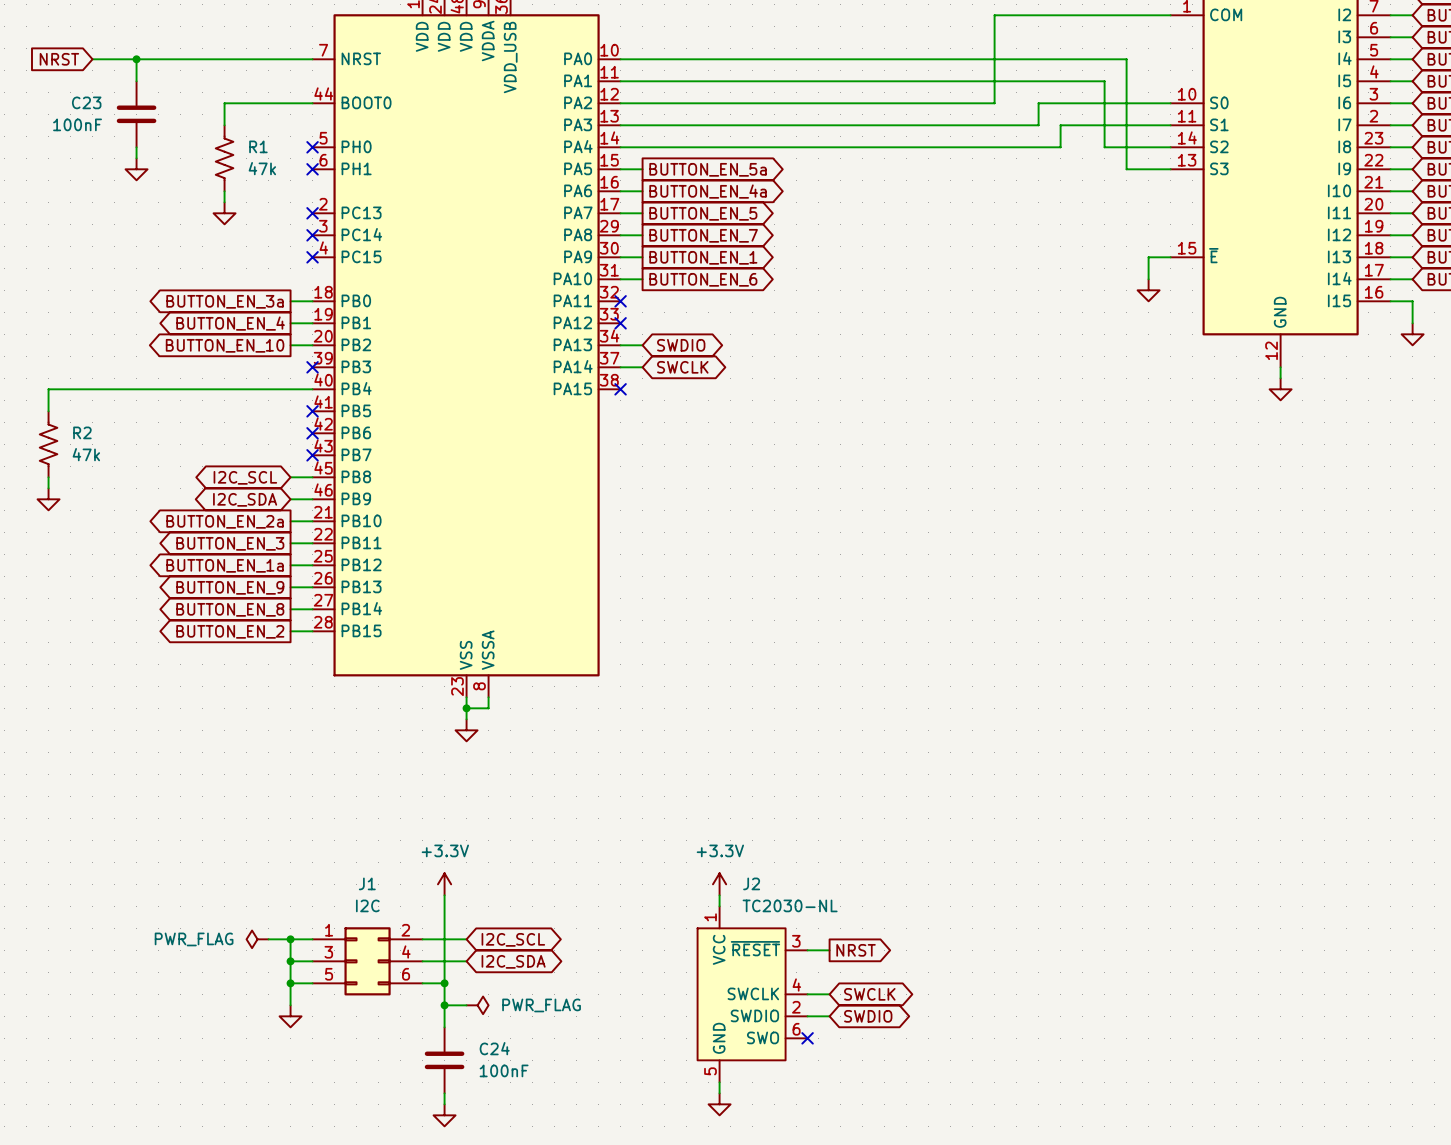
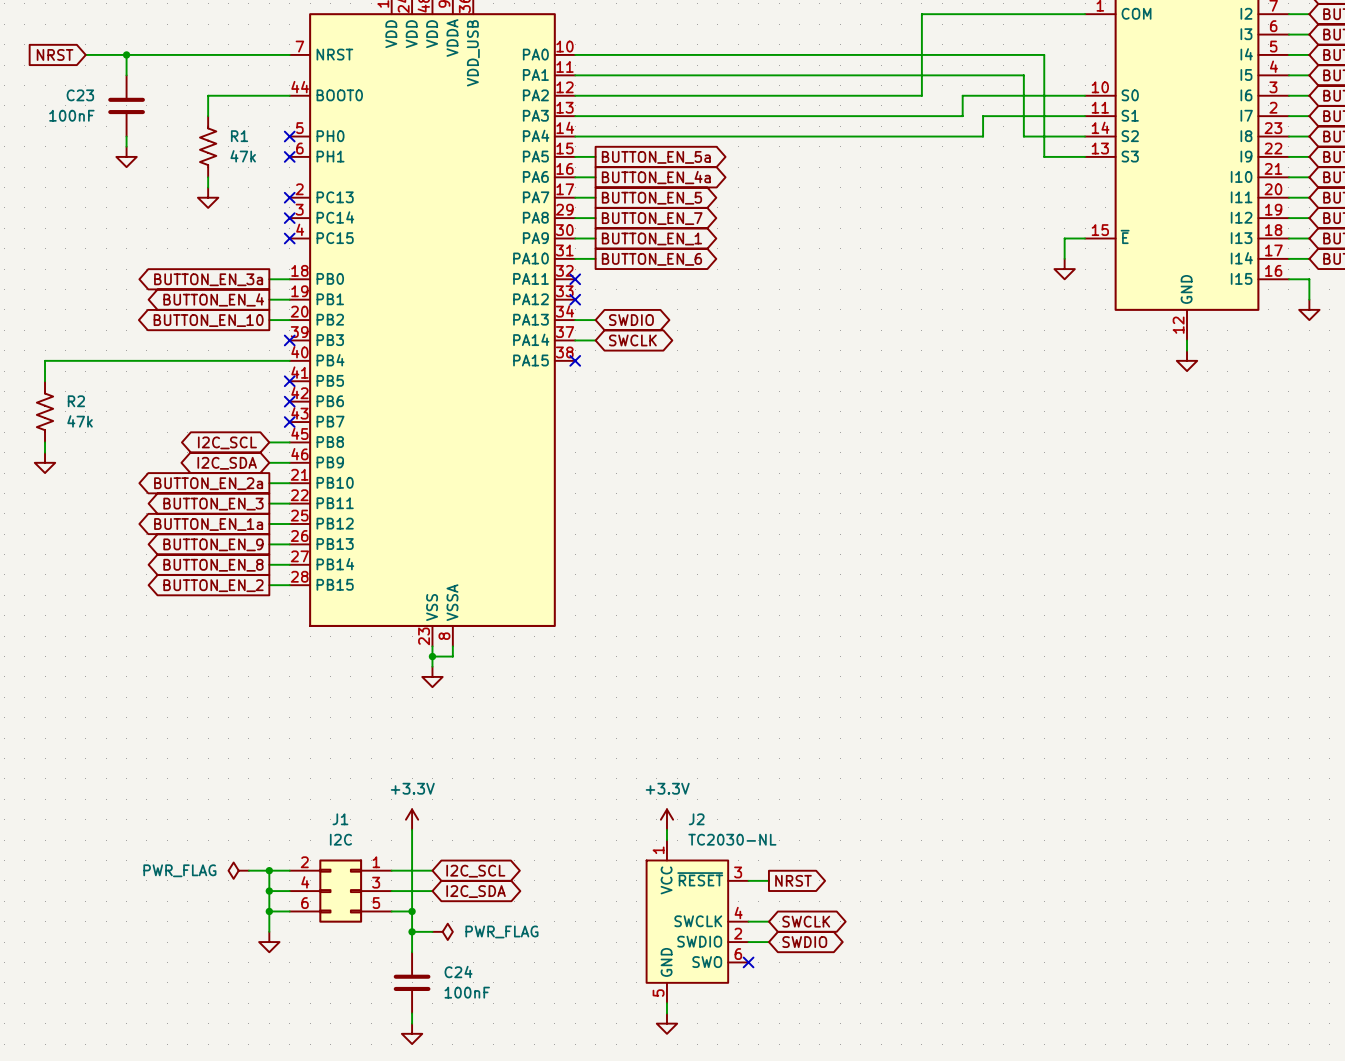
J1 flip: as is (367, 961) -> left-right (340, 891)

